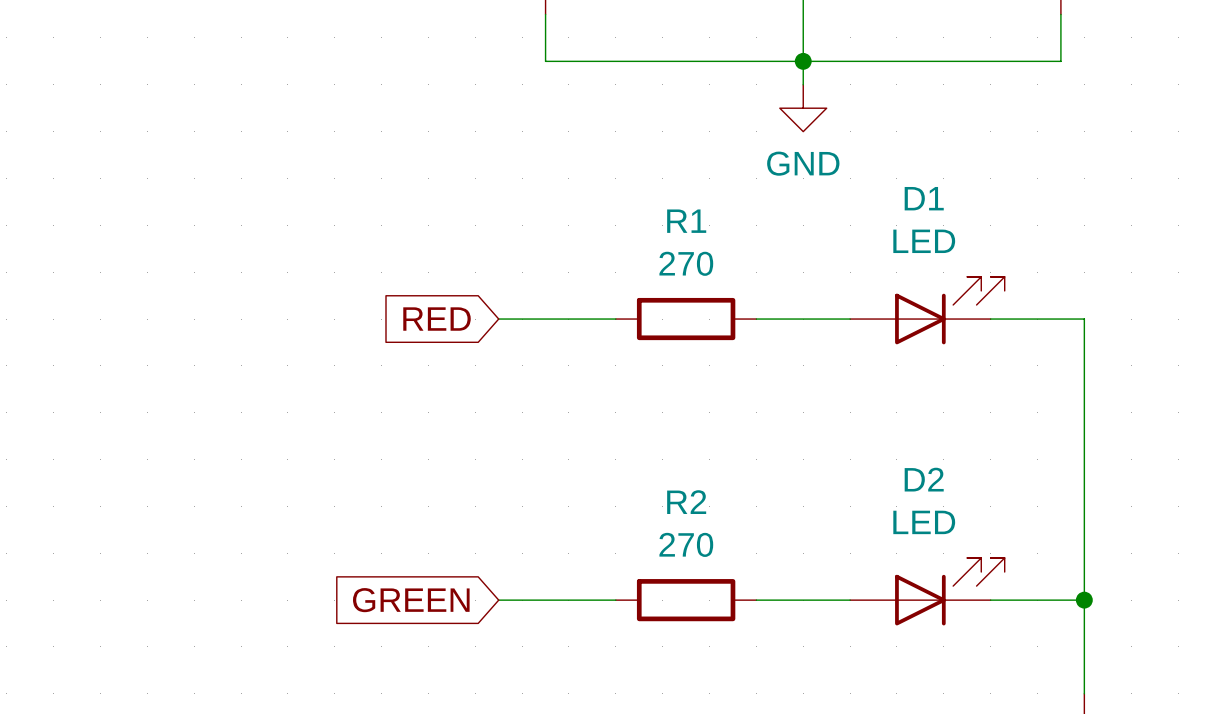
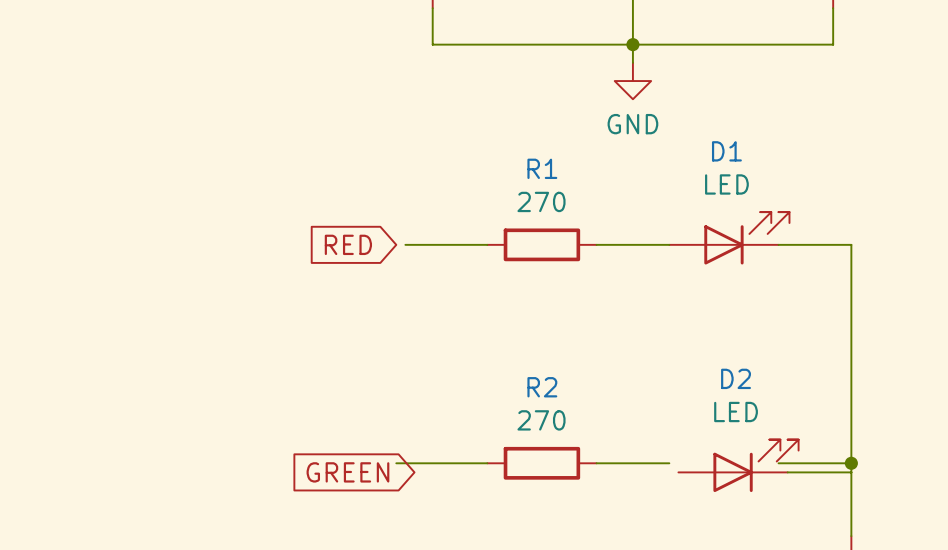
wire: (498, 319) (510, 319) -> none
D2 position: (927, 591) -> (738, 465)
global label position: GREEN (411, 600) -> GREEN (347, 472)
wire: none -> (787, 472) (851, 472)

